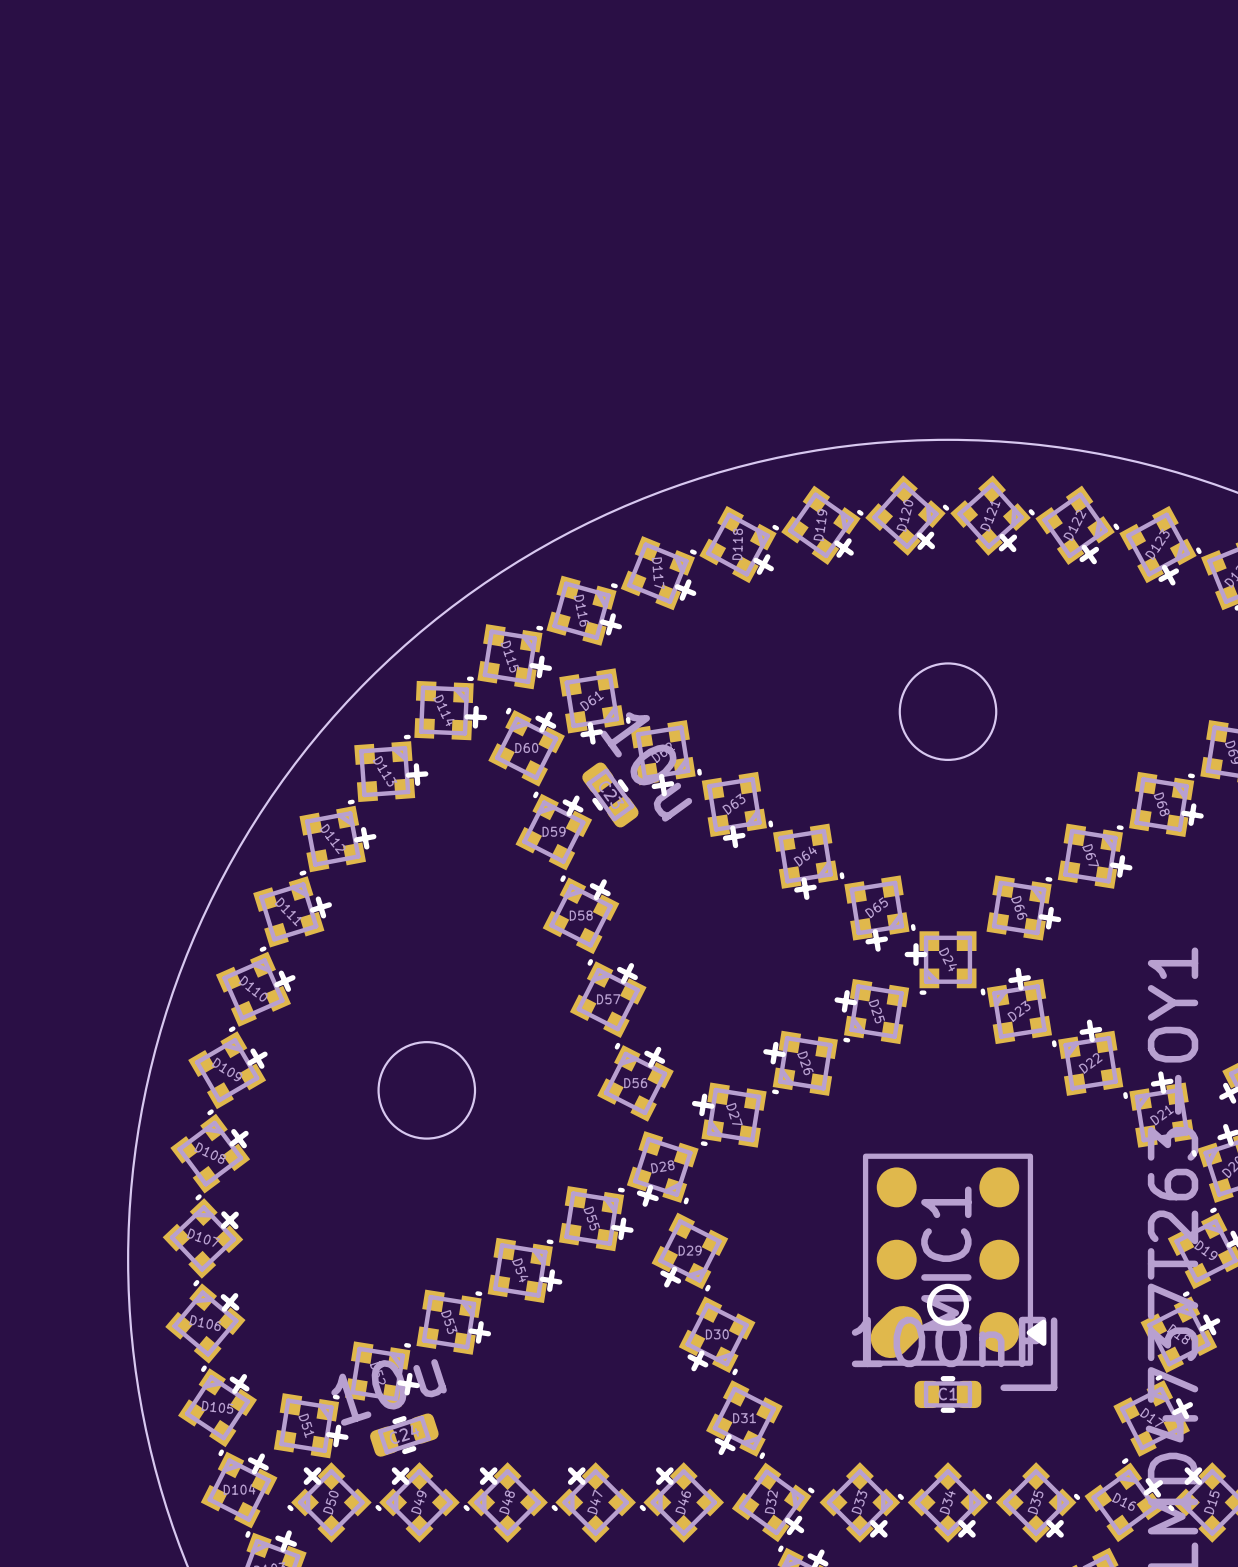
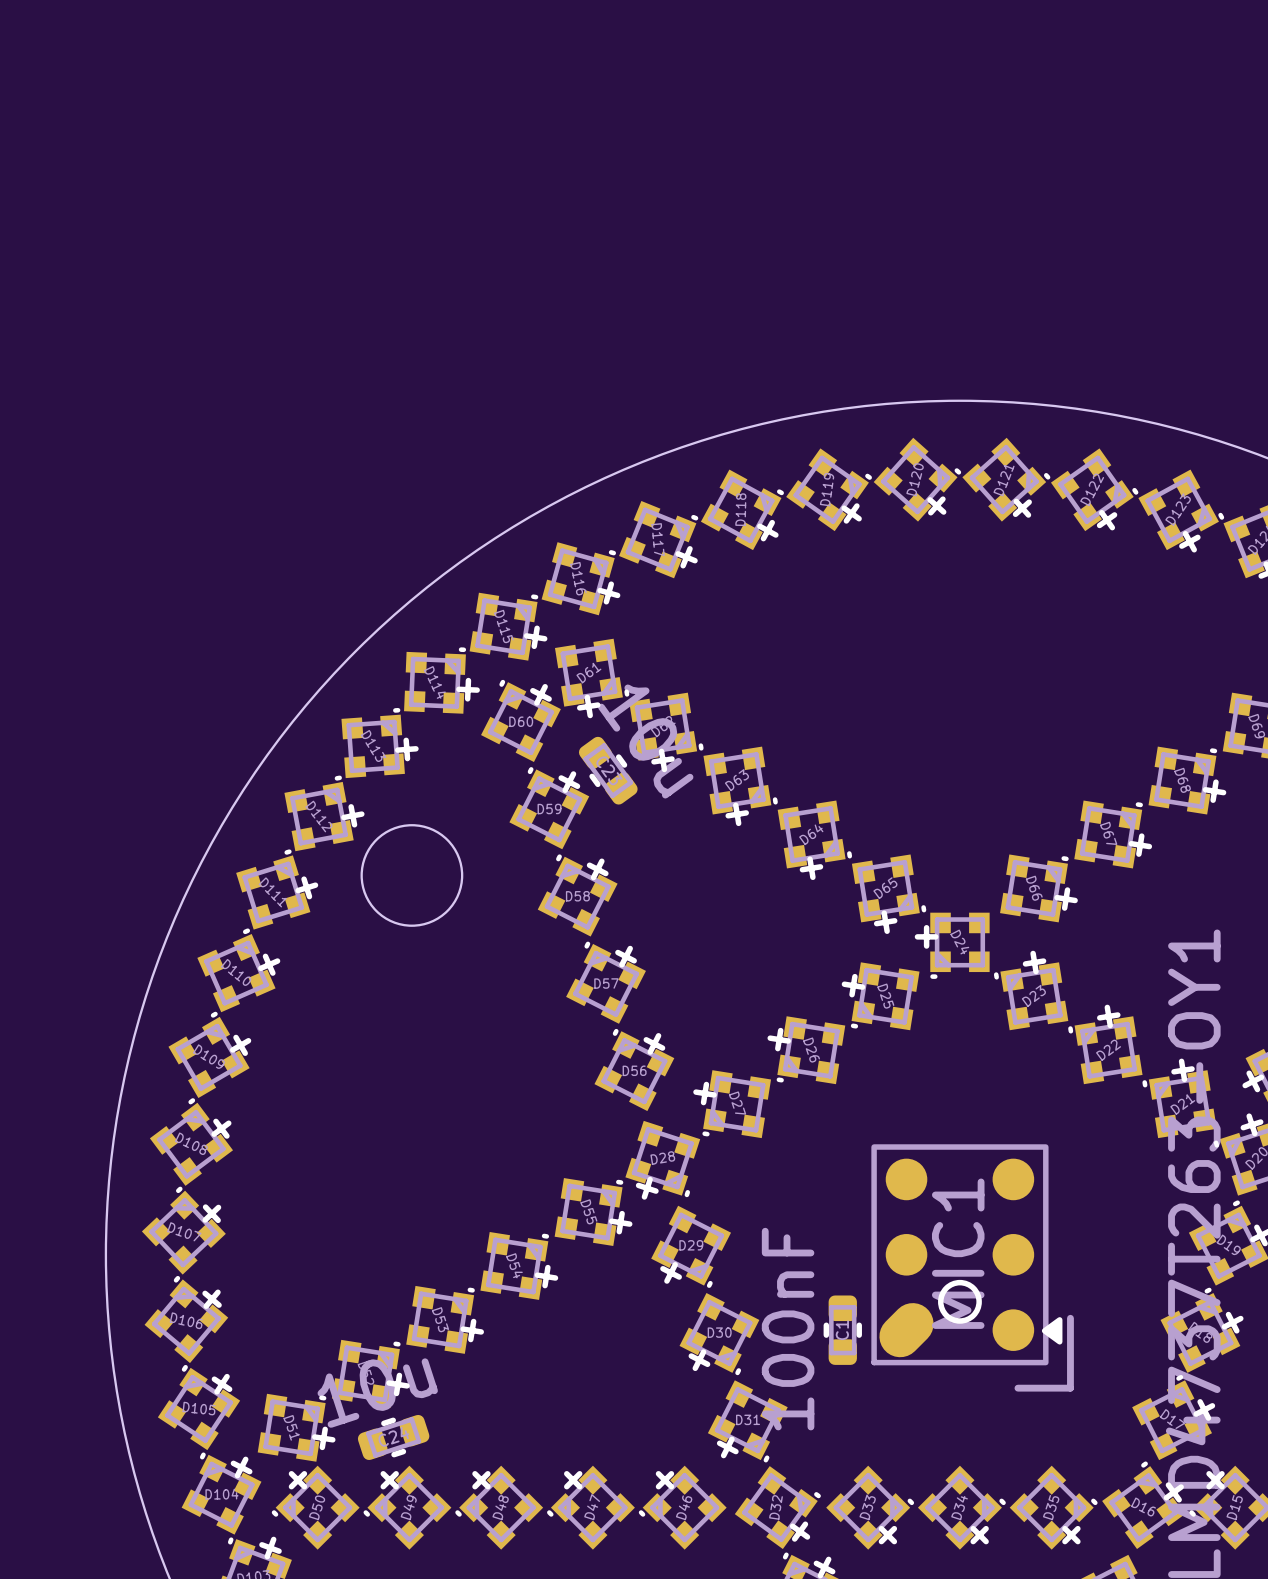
round board edge: [898, 662, 998, 761] -> none
round board edge position: (426, 1090) -> (411, 875)
C1 rotation: 0° (948, 1394) -> 90° clockwise (842, 1330)
C1 position: (948, 1394) -> (842, 1330)

